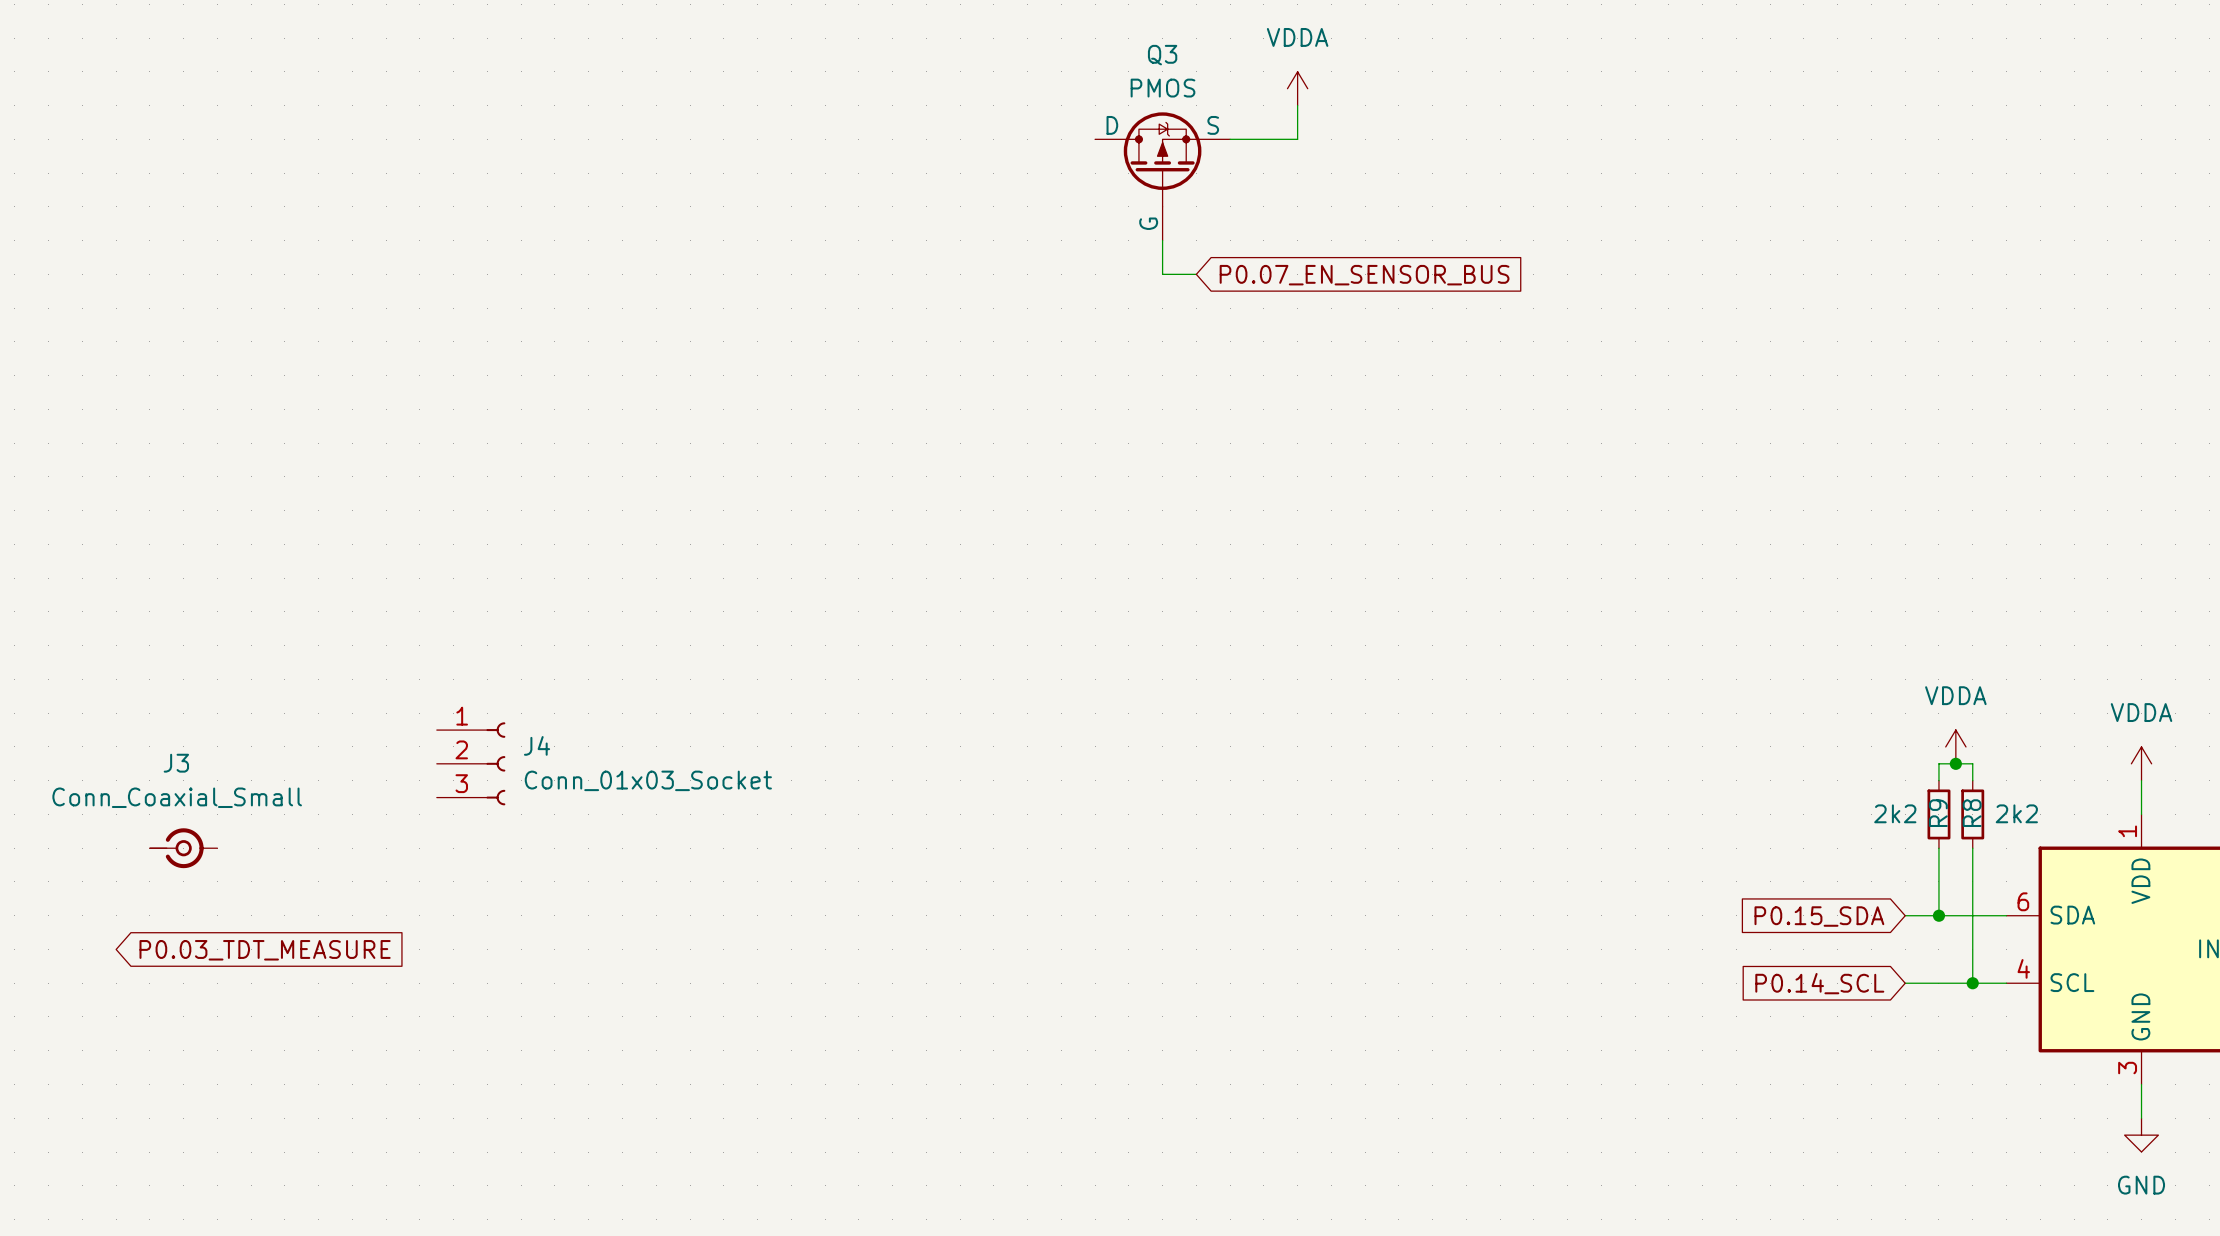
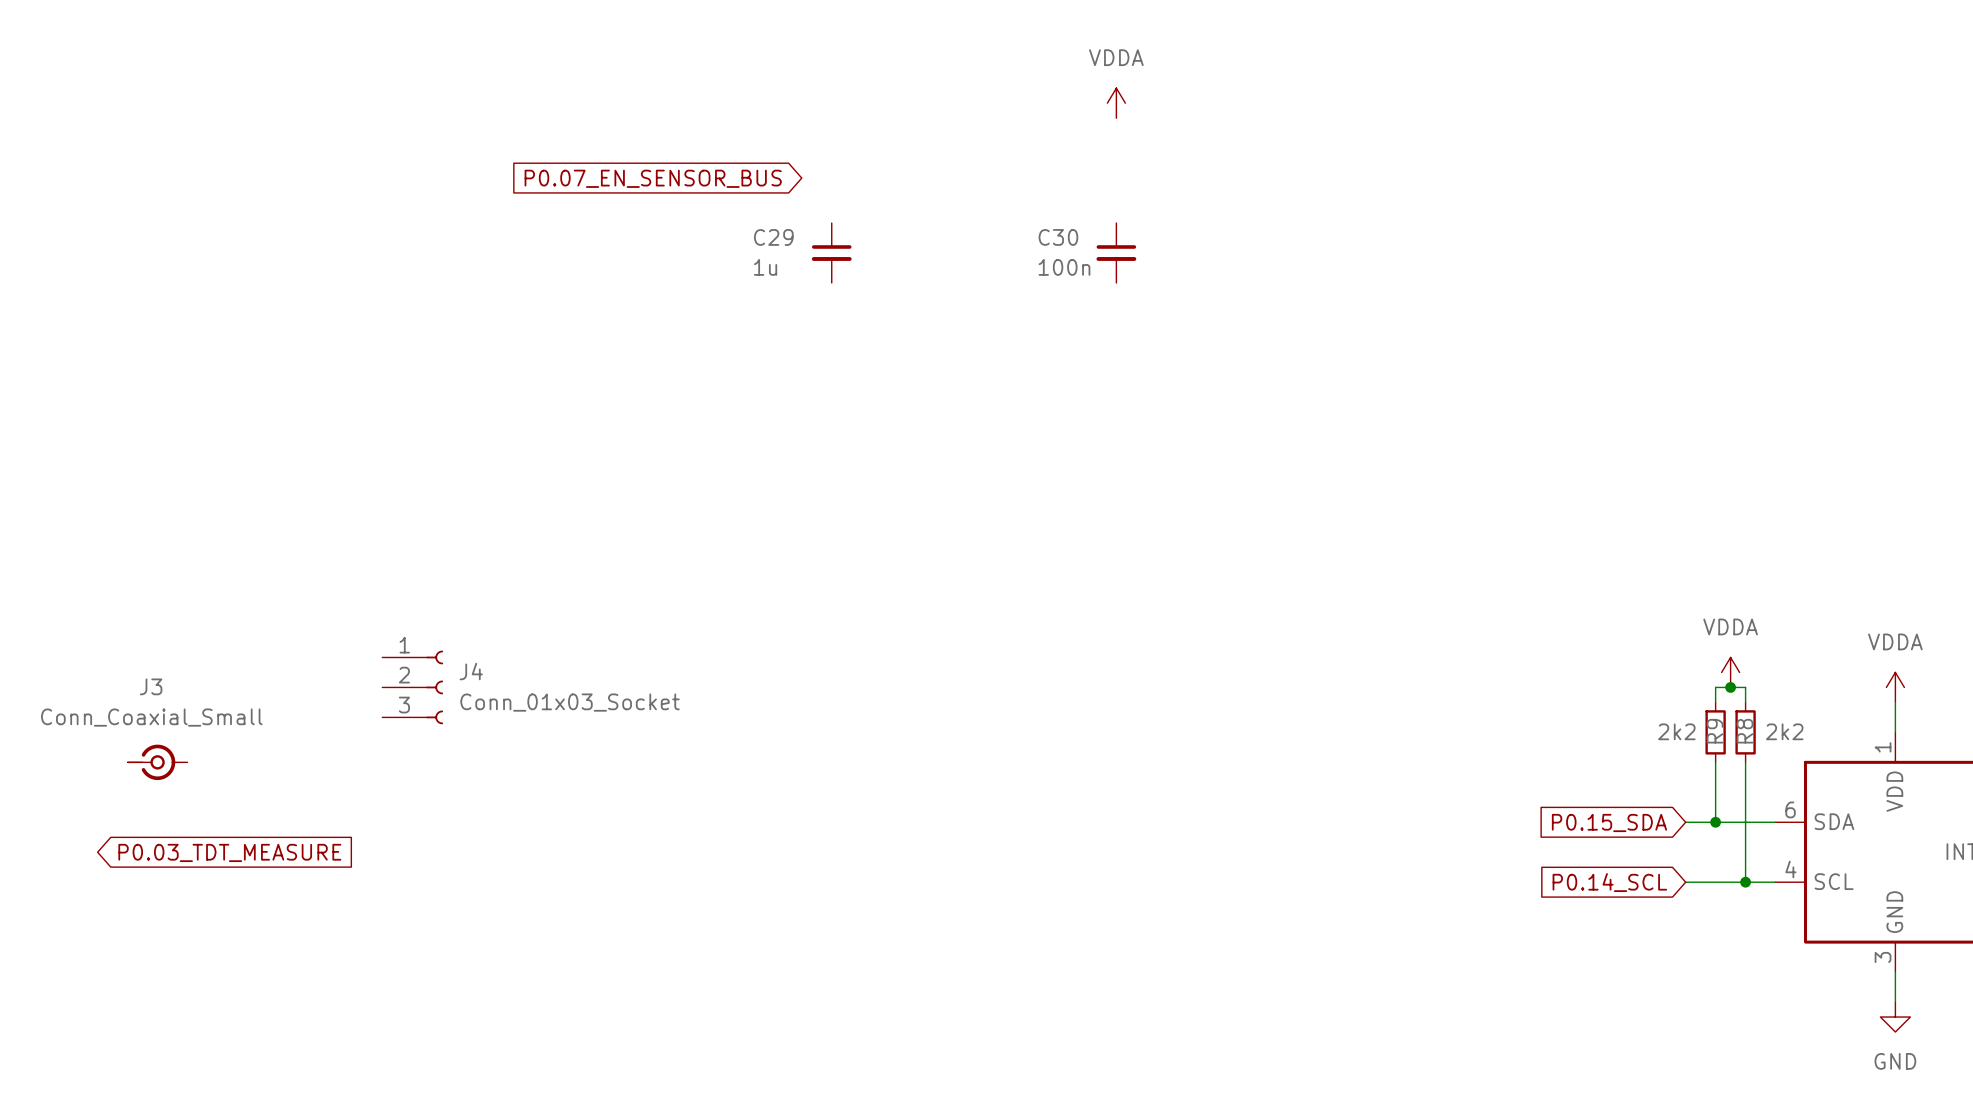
power symbol position: VDDA (1297, 88) -> VDDA (1116, 103)
wire: (1297, 105) (1297, 139) (1230, 139) -> none
Q3: PMOS (1162, 176) -> none
wire: (1162, 240) (1162, 274) (1196, 274) -> none
C29: none -> 1u (831, 252)
C30: none -> 100n (1116, 252)
global label rotation: 0° (1364, 275) -> 180° (653, 178)
global label position: P0.07_EN_SENSOR_BUS (1364, 275) -> P0.07_EN_SENSOR_BUS (653, 178)

